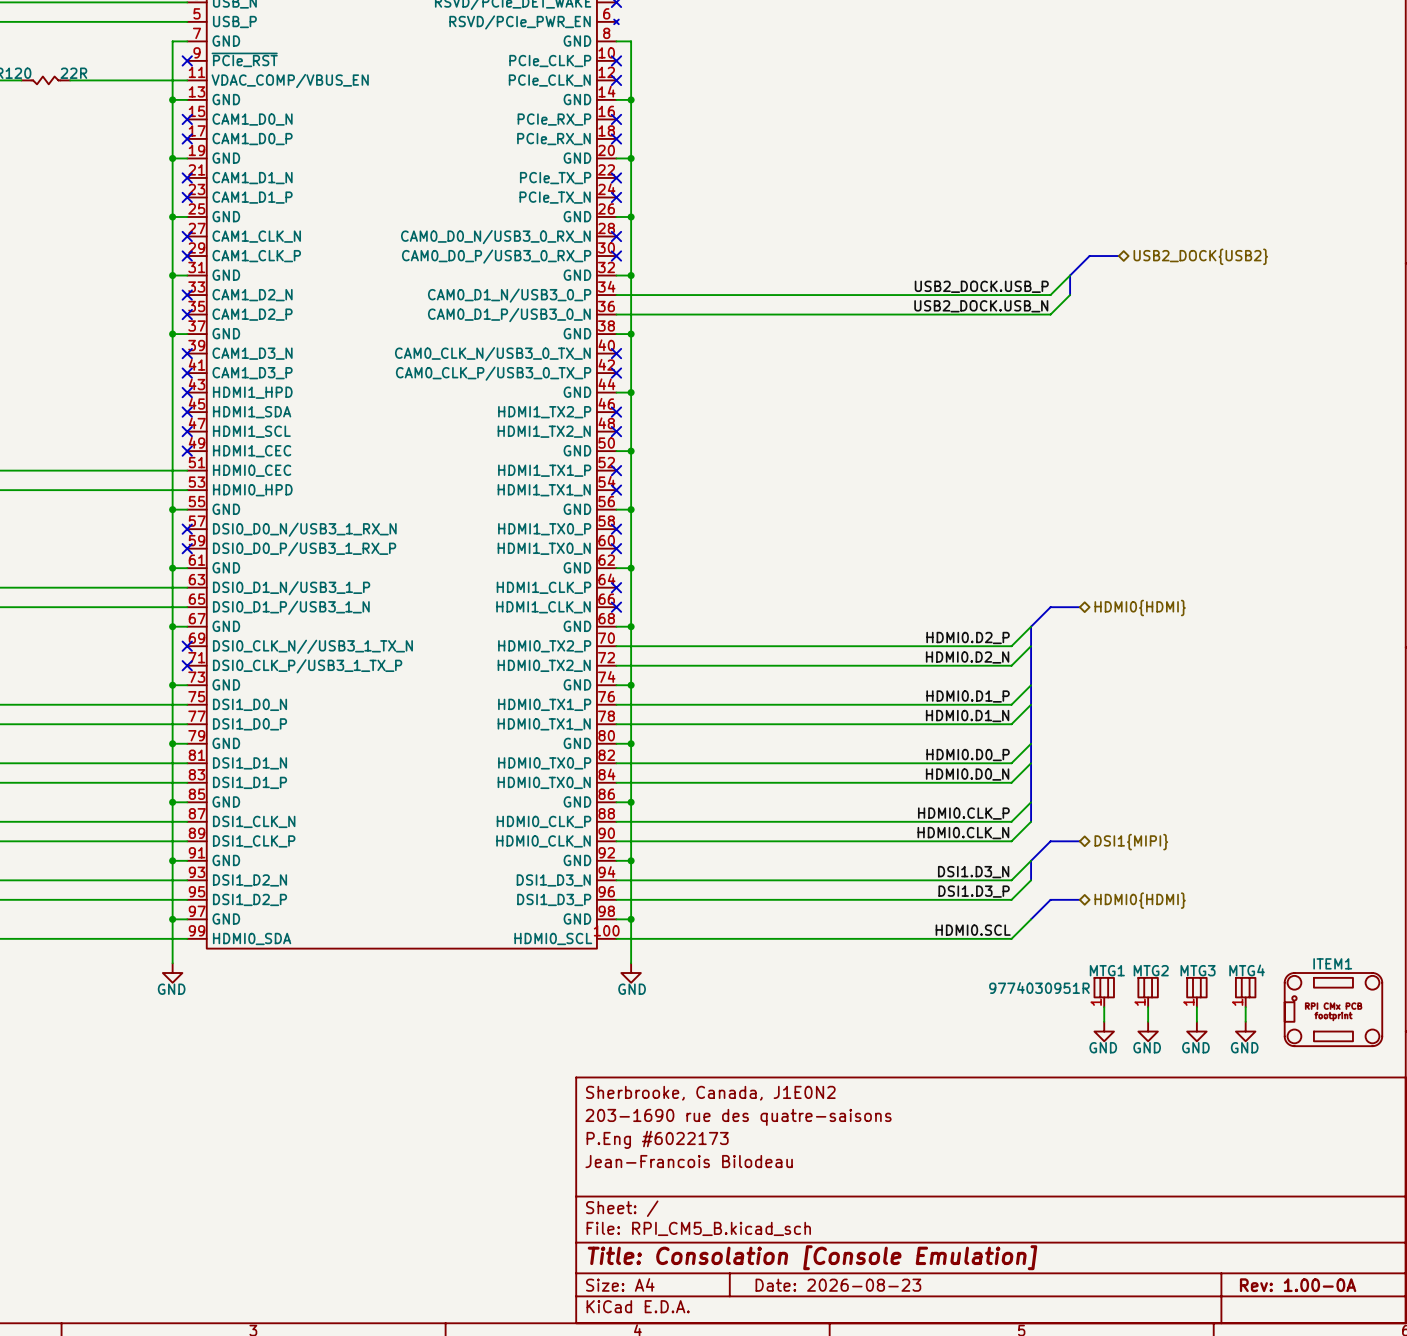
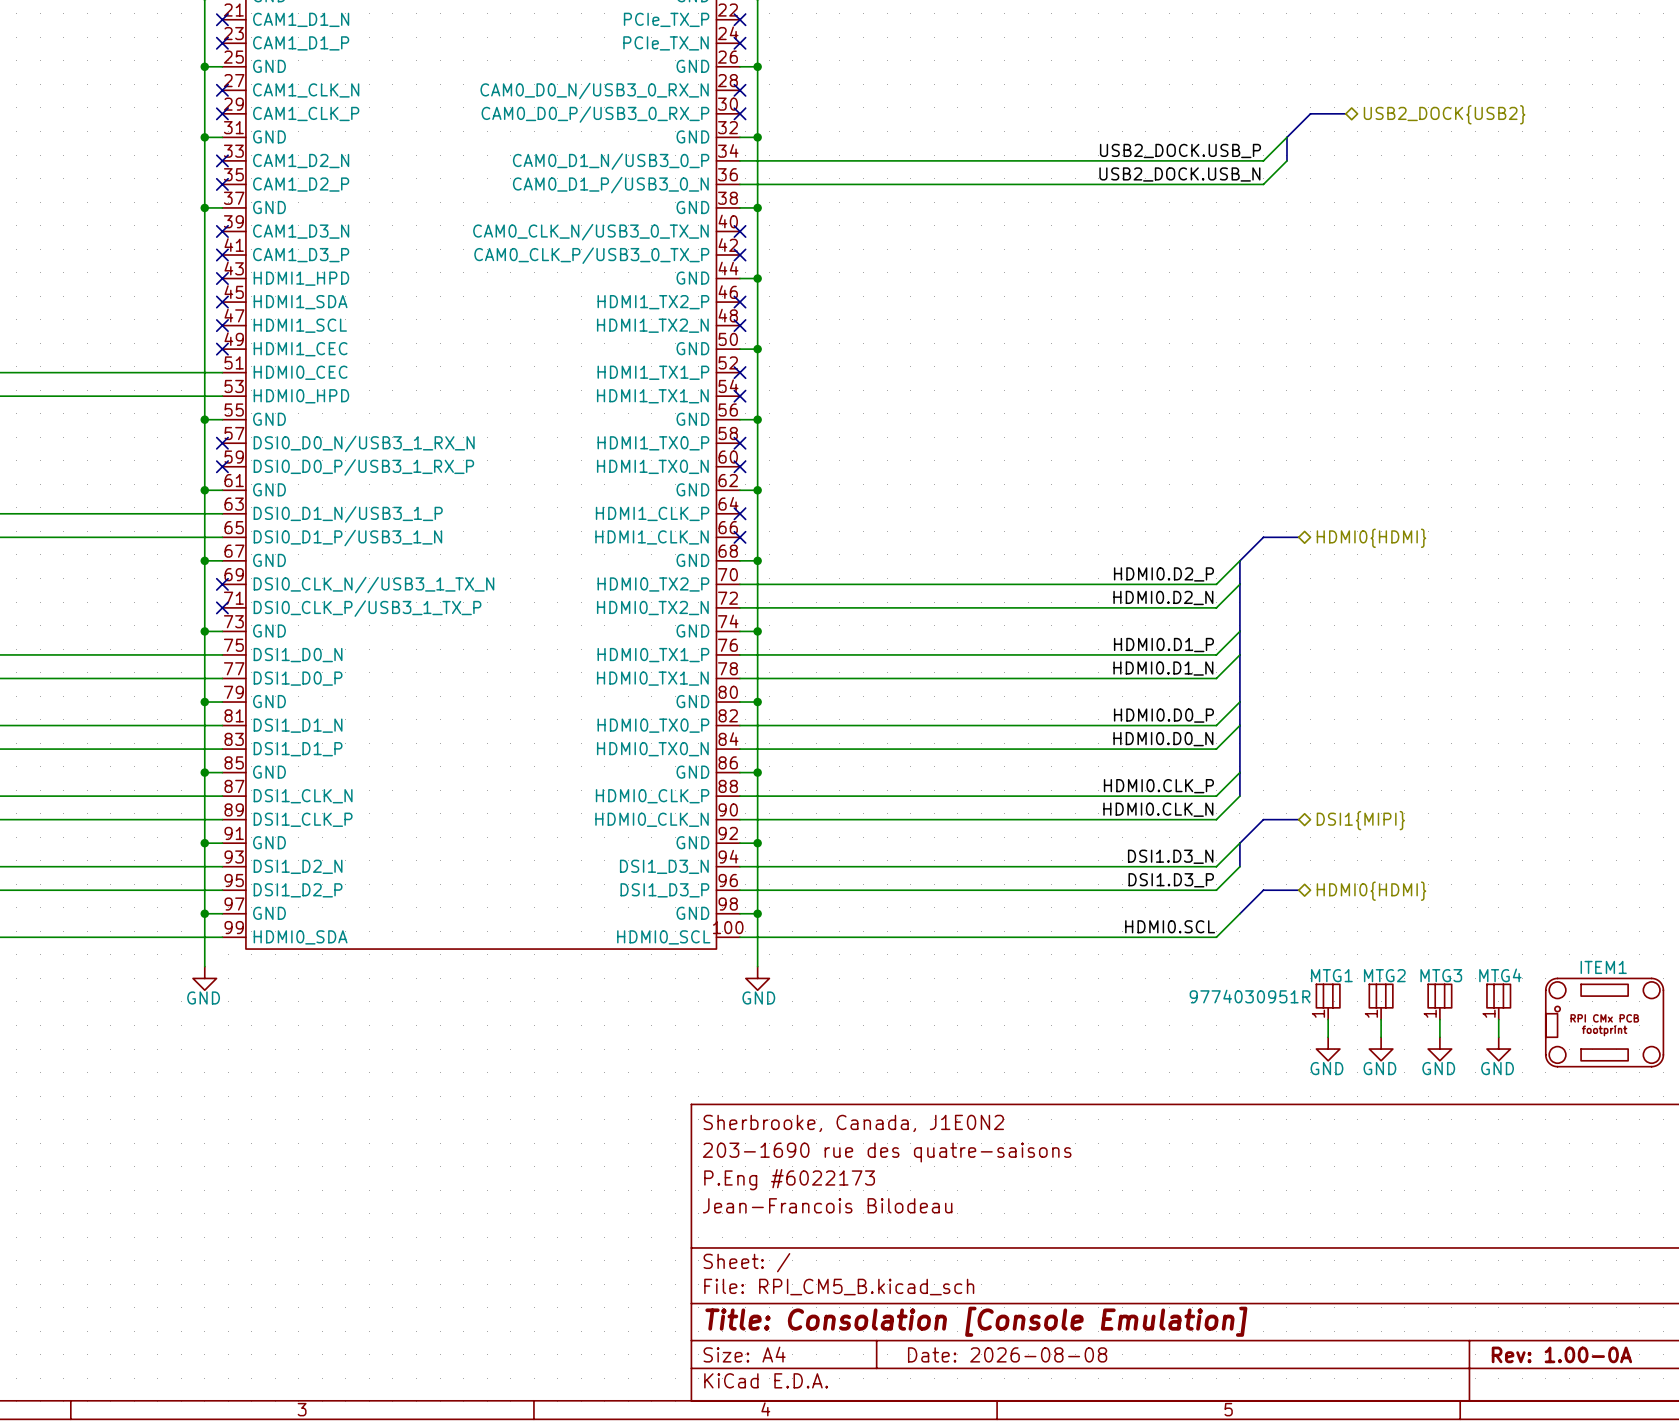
title block: Date: 2026-08-23 (838, 1285) -> Date: 2026-08-08 (1007, 1354)

